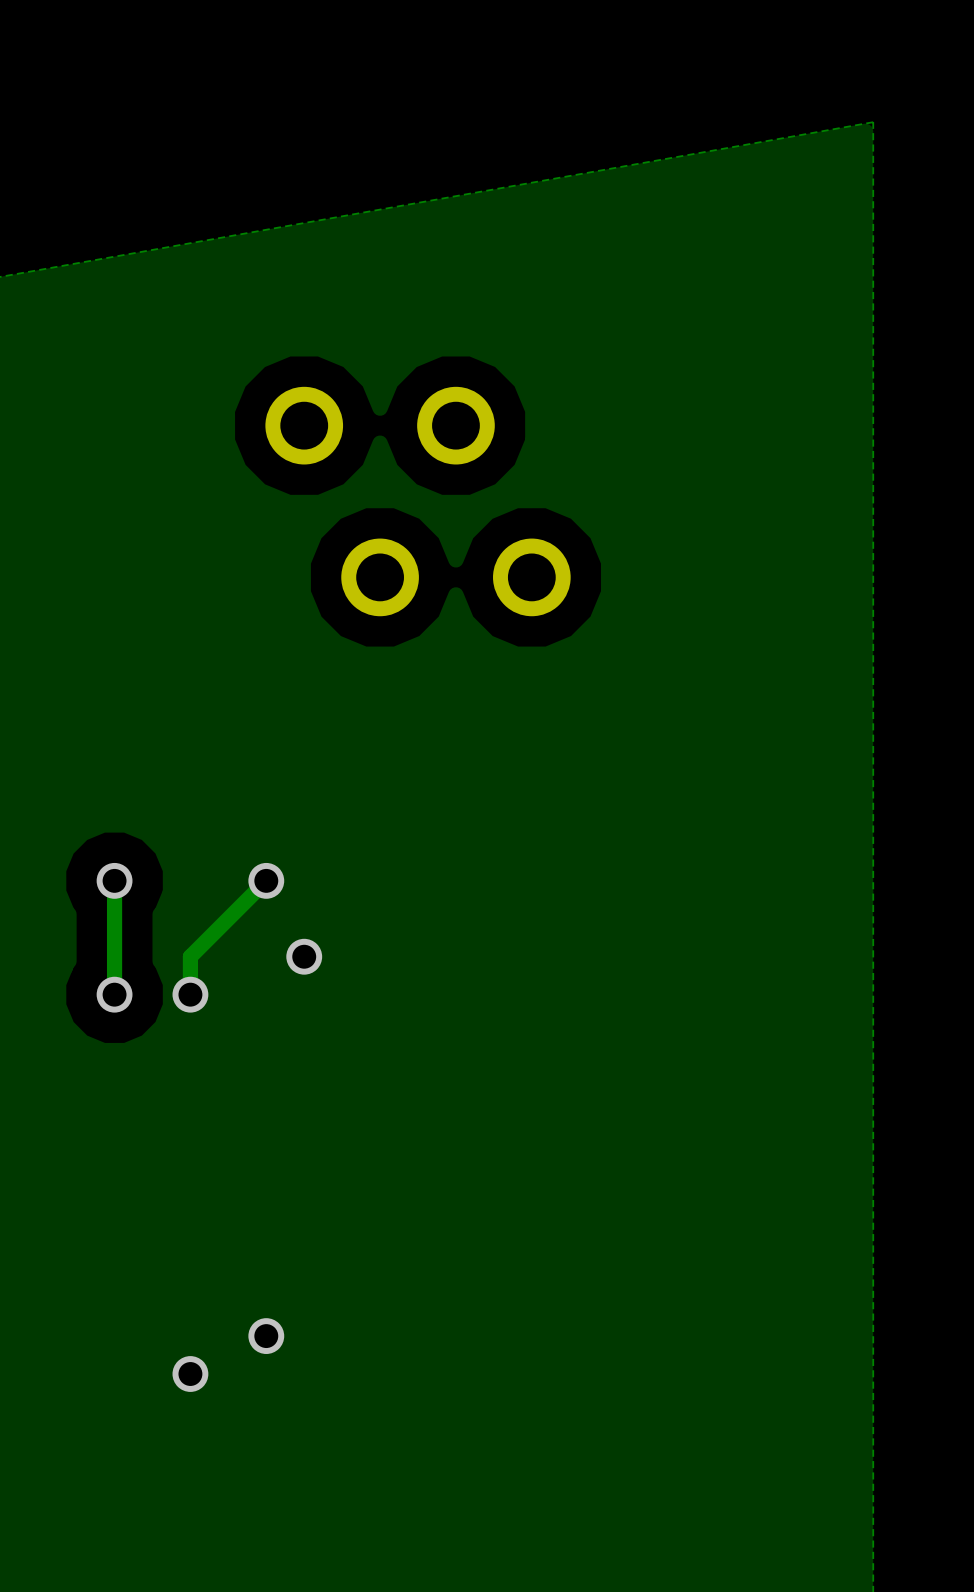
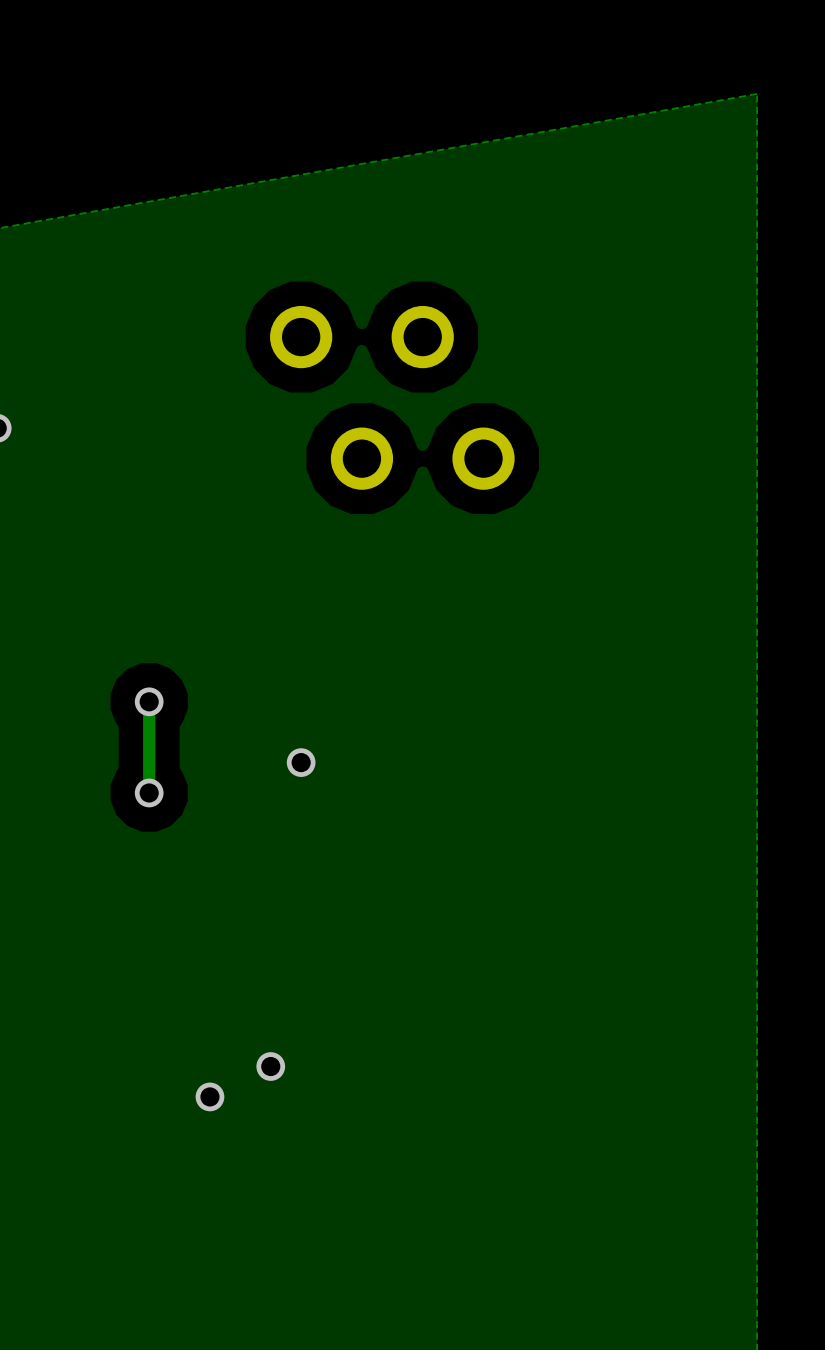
track: (266, 880) (190, 956) (190, 994) -> none
via: (266, 880) -> none
via: (190, 994) -> none

